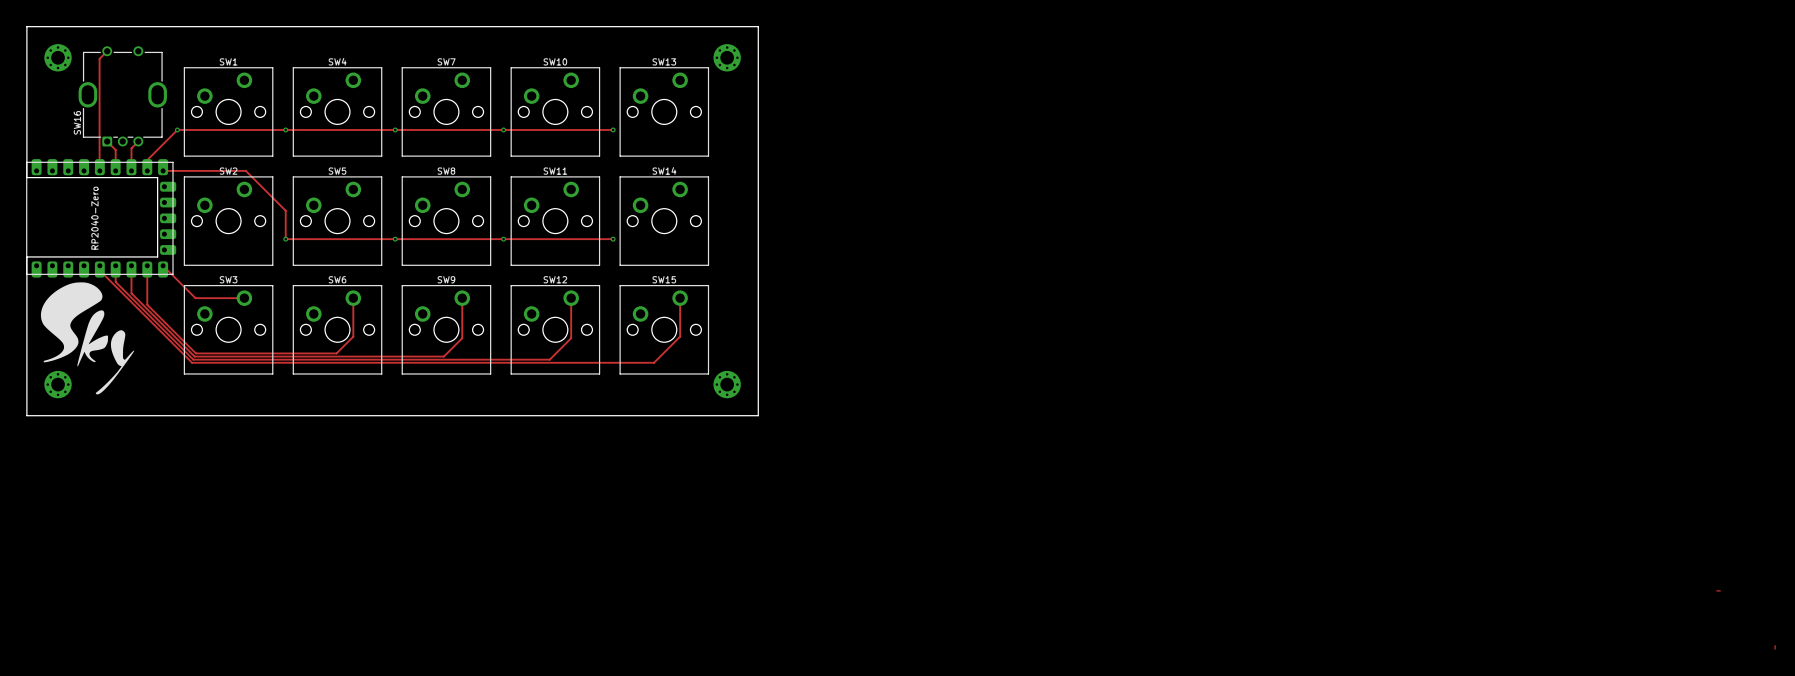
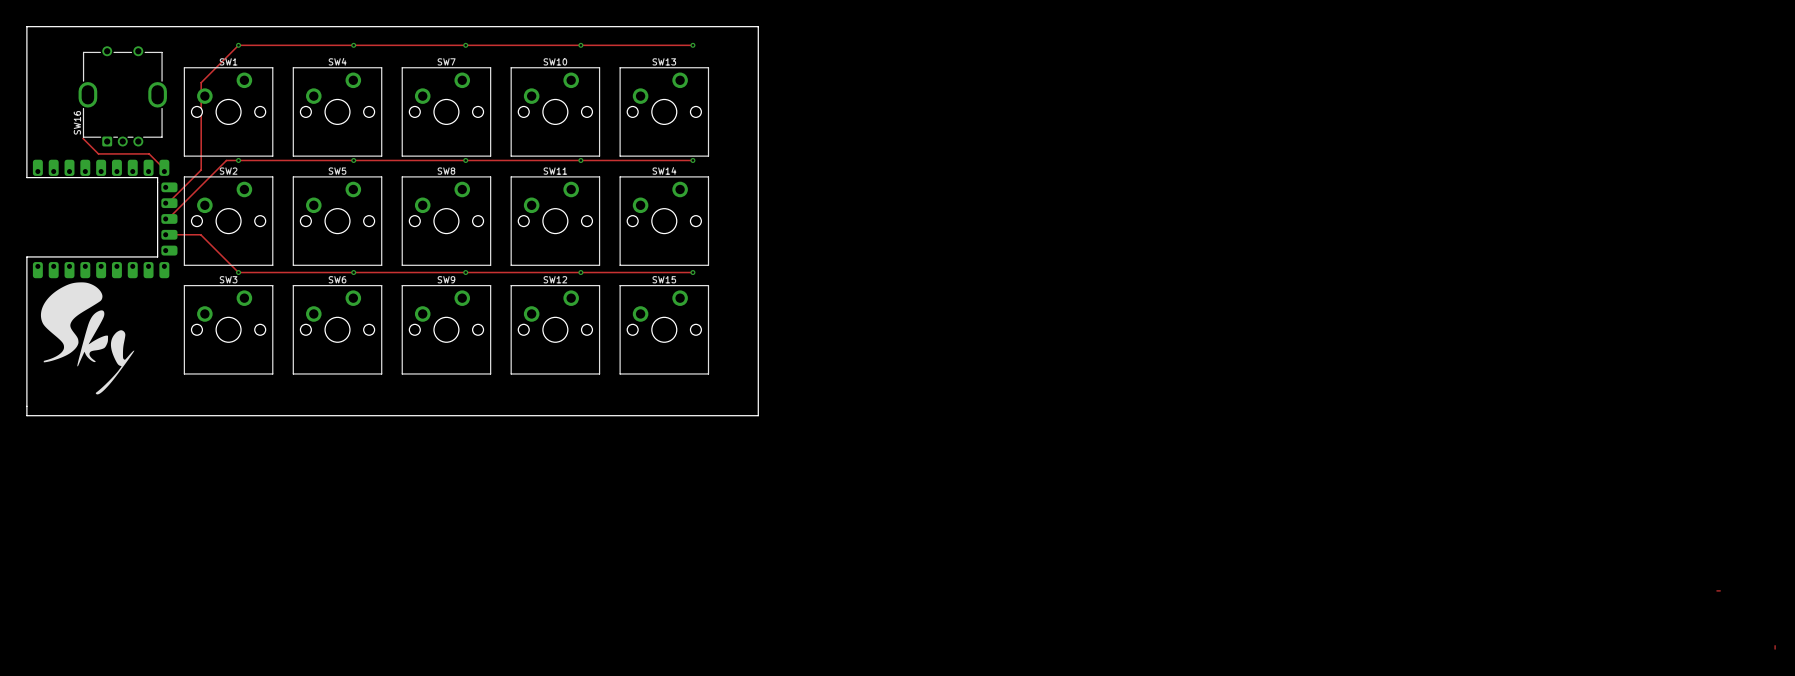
via: none -> (238, 45)
via: none -> (353, 45)
via: none -> (465, 45)
via: none -> (580, 45)
track: none -> (692, 45) (238, 45) (201, 82) (201, 169) (168, 203) (165, 203)
via: none -> (692, 45)
track: (107, 51) (99, 58) (99, 170) -> none
part: (58, 57) -> none
part: (727, 57) -> none
track: (177, 129) (613, 129) -> none
track: (177, 129) (147, 160) (147, 170) -> none
via: (177, 129) -> none
via: (285, 129) -> none
via: (395, 129) -> none
via: (503, 129) -> none
via: (613, 129) -> none
track: none -> (82, 138) (98, 153) (149, 153) (164, 169) (164, 171)
track: (107, 141) (115, 149) (115, 170) -> none
track: (138, 141) (131, 148) (131, 170) -> none
via: none -> (238, 160)
via: none -> (353, 160)
via: none -> (465, 160)
via: none -> (580, 160)
track: none -> (692, 160) (226, 160) (168, 218) (165, 218)
via: none -> (692, 160)
track: (163, 170) (245, 170) (285, 210) (285, 239) (613, 239) -> none
part side: top (101, 218) -> bottom (105, 218)
track: none -> (165, 234) (200, 234) (238, 272) (692, 272)
via: (285, 239) -> none
via: (395, 239) -> none
via: (503, 239) -> none
via: (613, 239) -> none
track: (99, 265) (99, 270) (192, 362) (654, 362) (680, 336) (680, 298) -> none
track: (115, 265) (115, 281) (193, 359) (549, 359) (571, 338) (571, 298) -> none
track: (131, 265) (131, 293) (194, 356) (443, 356) (462, 338) (462, 298) -> none
track: (147, 265) (147, 304) (195, 353) (336, 353) (353, 336) (353, 298) -> none
track: (163, 265) (195, 298) (244, 298) -> none
via: none -> (238, 272)
via: none -> (353, 272)
via: none -> (465, 272)
via: none -> (580, 272)
via: none -> (692, 272)
part: (58, 384) -> none
part: (727, 384) -> none

